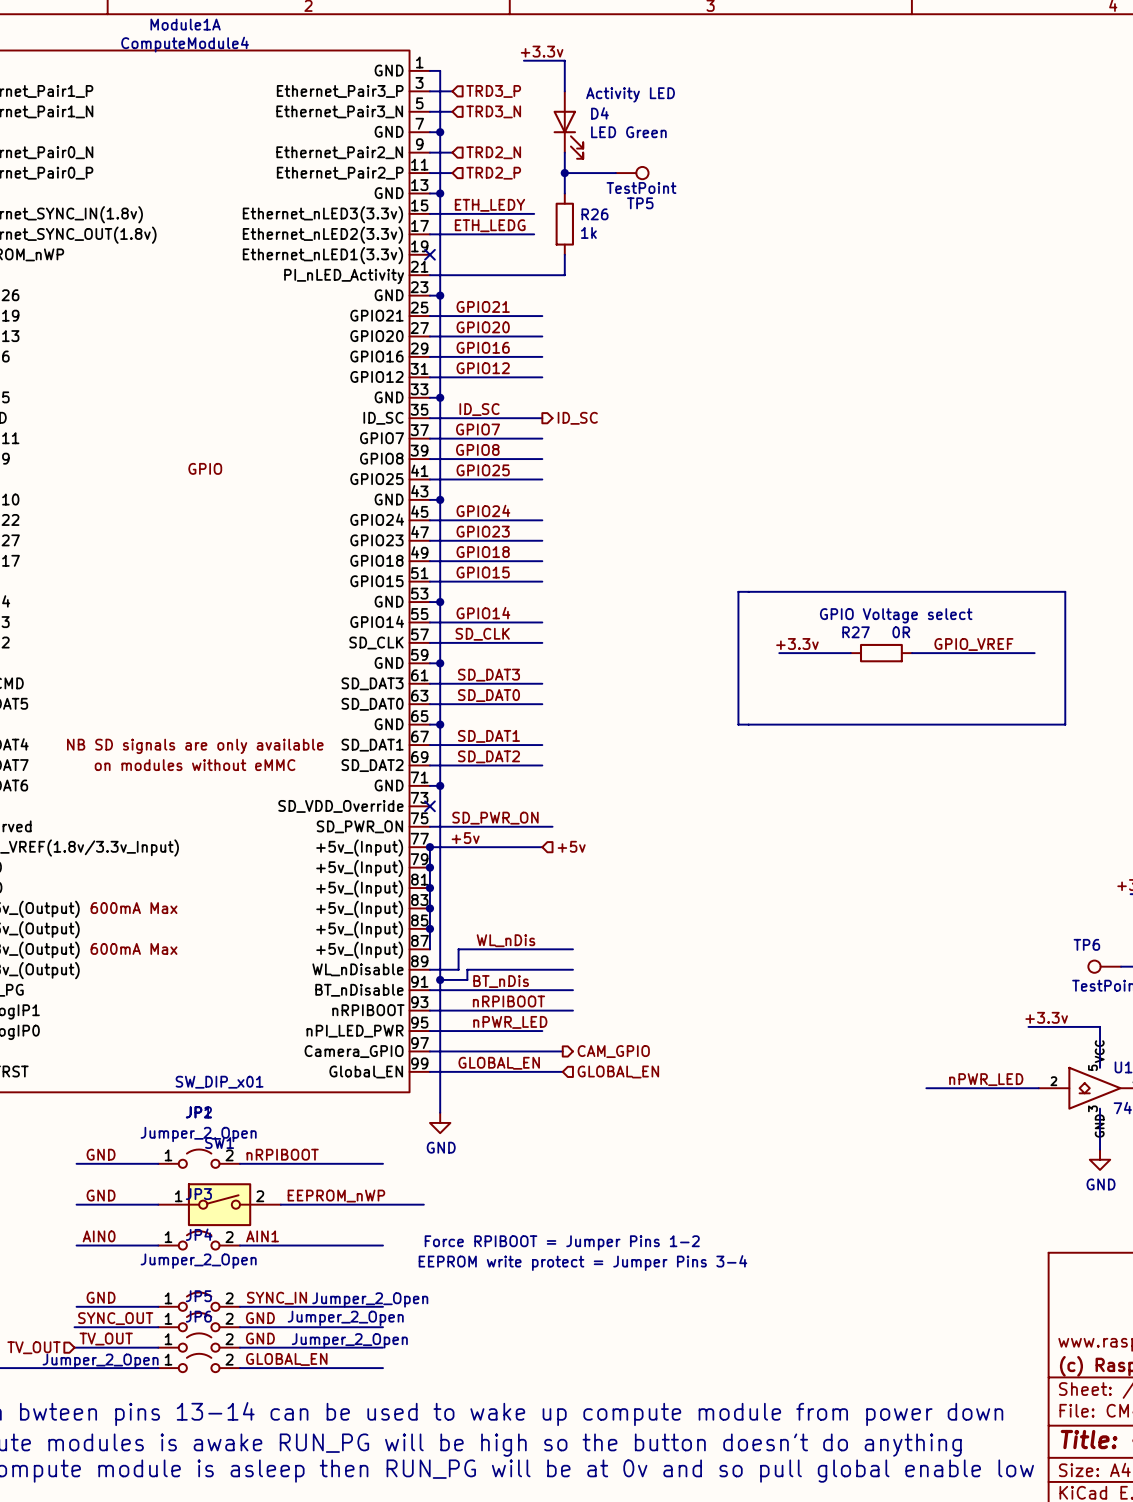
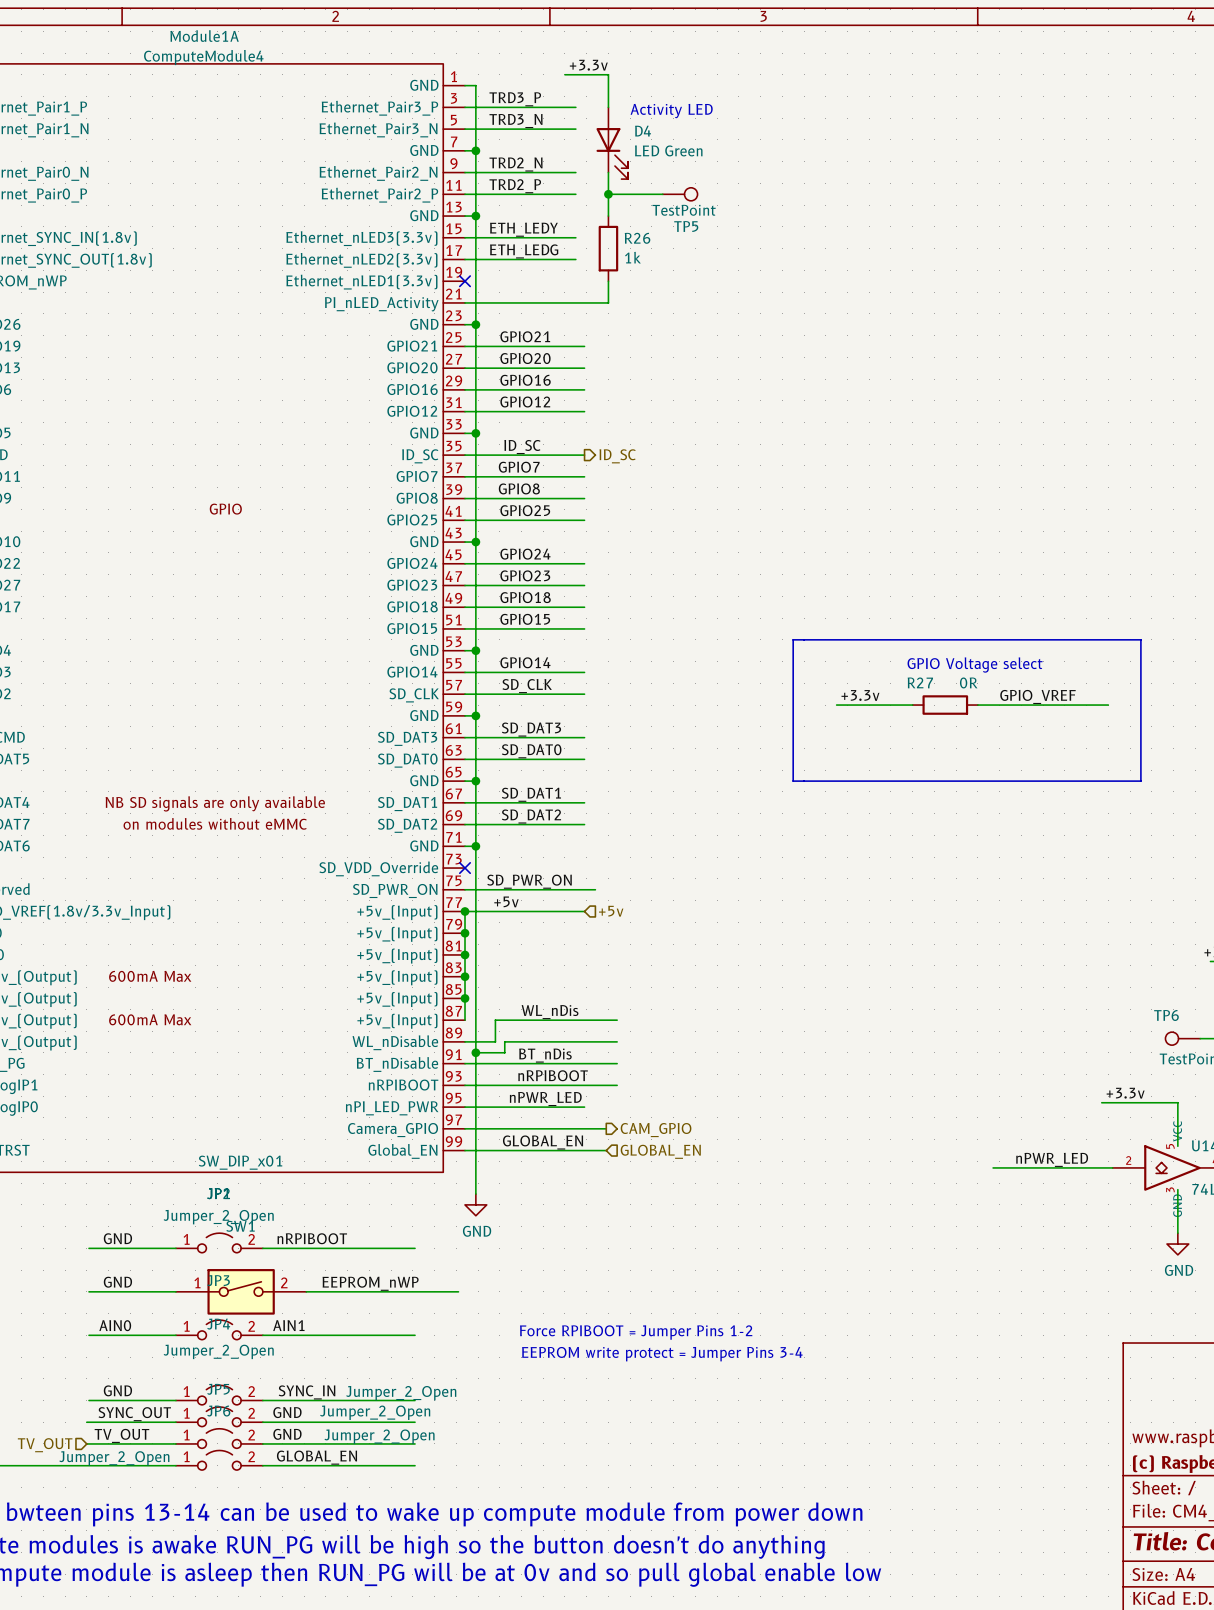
label: none -> TRD3_P (515, 99)
wire: none -> (488, 107) (575, 107)
hierarchical label: TRD3_P (493, 91) -> none
label: none -> TRD3_N (515, 121)
wire: none -> (488, 129) (575, 129)
hierarchical label: TRD3_N (493, 111) -> none
label: none -> TRD2_N (515, 164)
wire: none -> (488, 172) (575, 172)
hierarchical label: TRD2_N (493, 152) -> none
label: none -> TRD2_P (515, 186)
wire: none -> (488, 194) (575, 194)
hierarchical label: TRD2_P (493, 173) -> none

